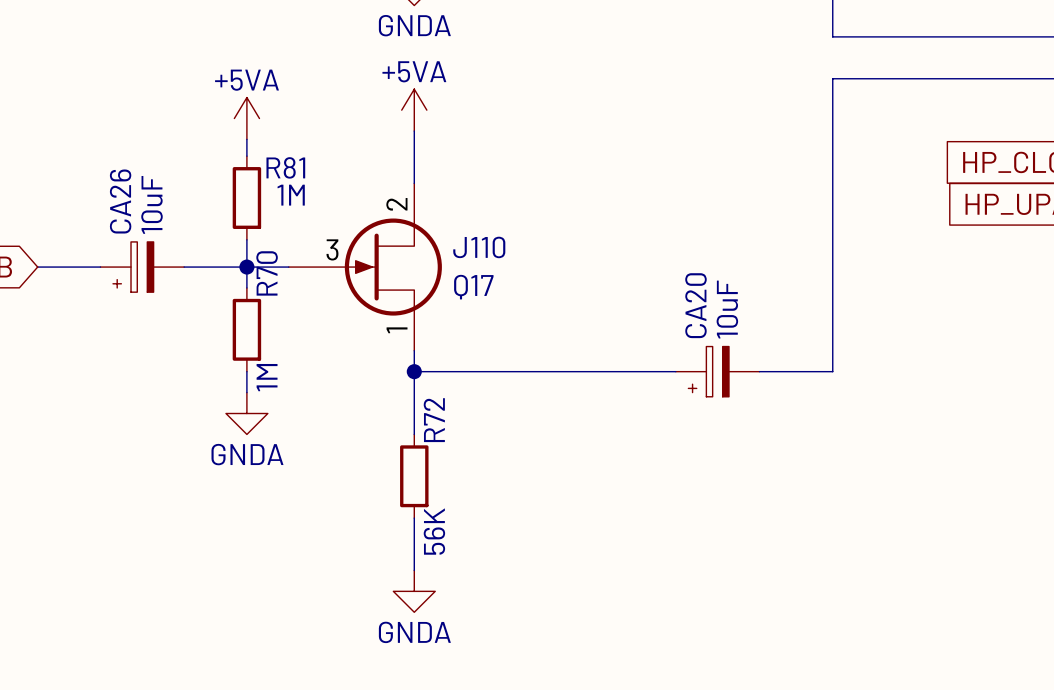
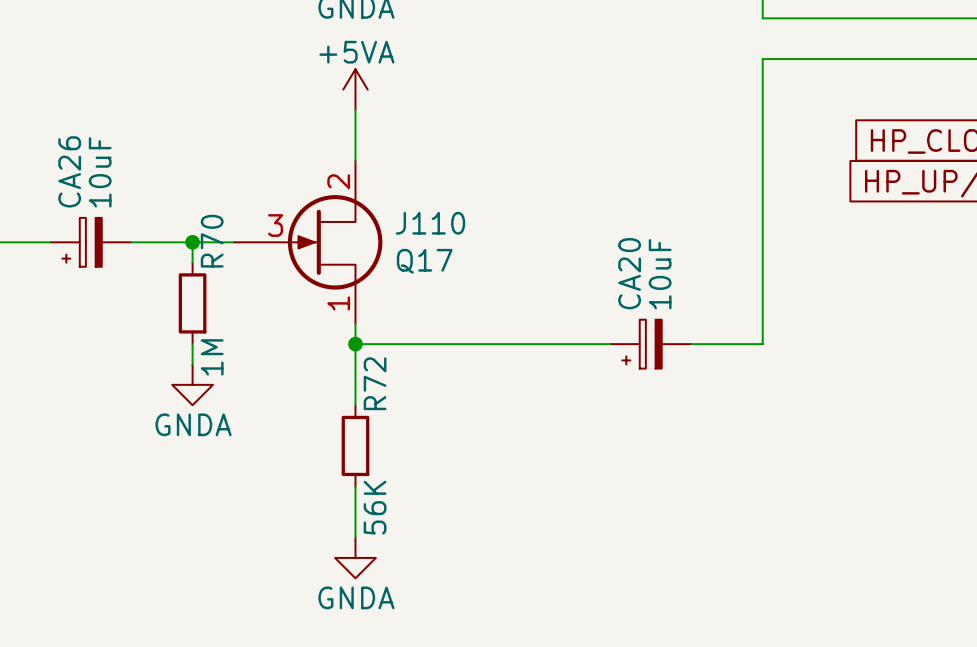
power symbol: +5VA (246, 118) -> none
wire: (246, 139) (246, 156) -> none
R81: 1M (246, 198) -> none
wire: (246, 239) (246, 267) -> none

